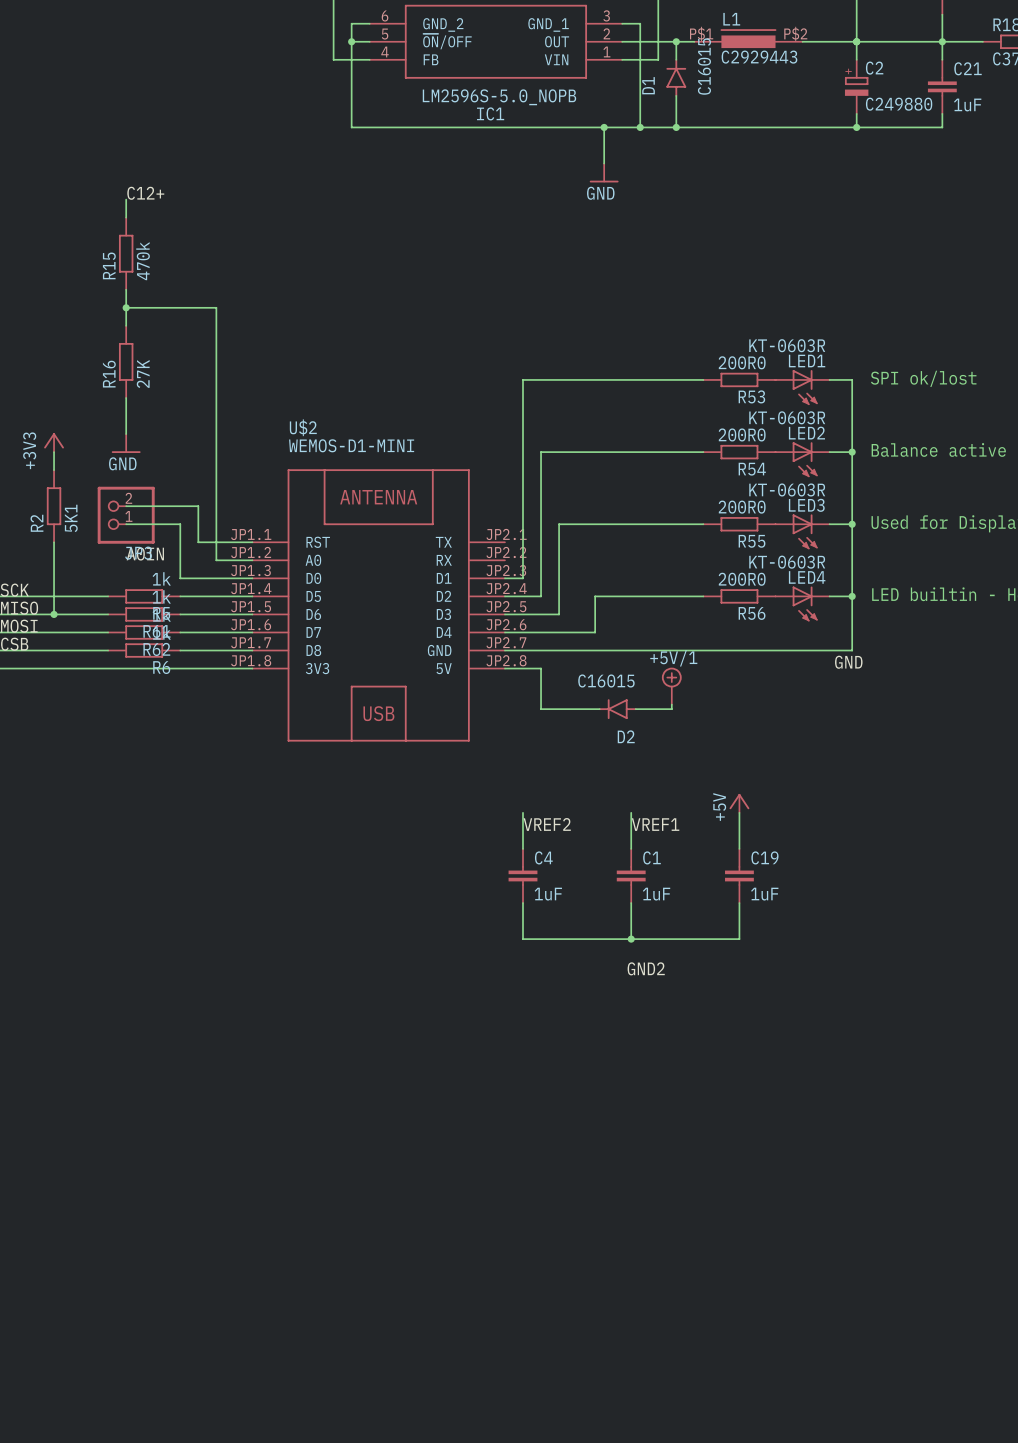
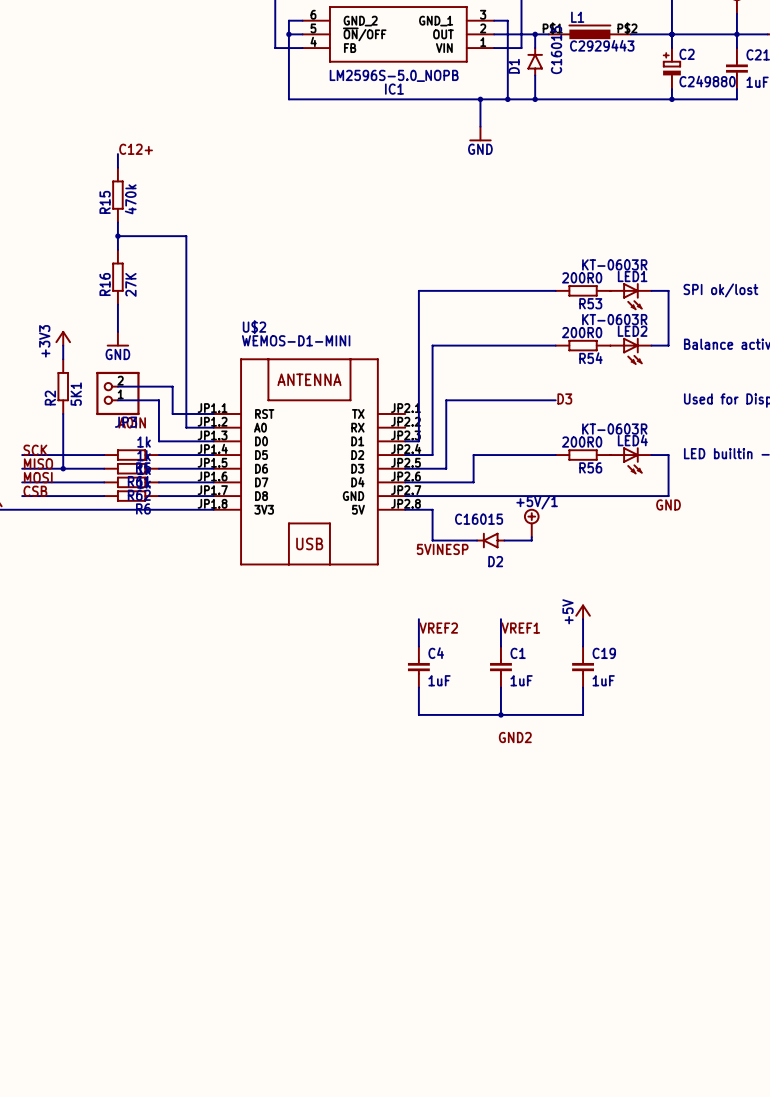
wire: (852, 452) (852, 596) -> none
junction: (852, 452) -> none
label: none -> D3 (564, 398)
R55: 200R0 (739, 524) -> none
wire: (829, 524) (852, 524) -> none
junction: (852, 524) -> none
LED3: KT-0603R (802, 531) -> none
junction: (852, 596) -> none
label: none -> 5VINESP (442, 549)

